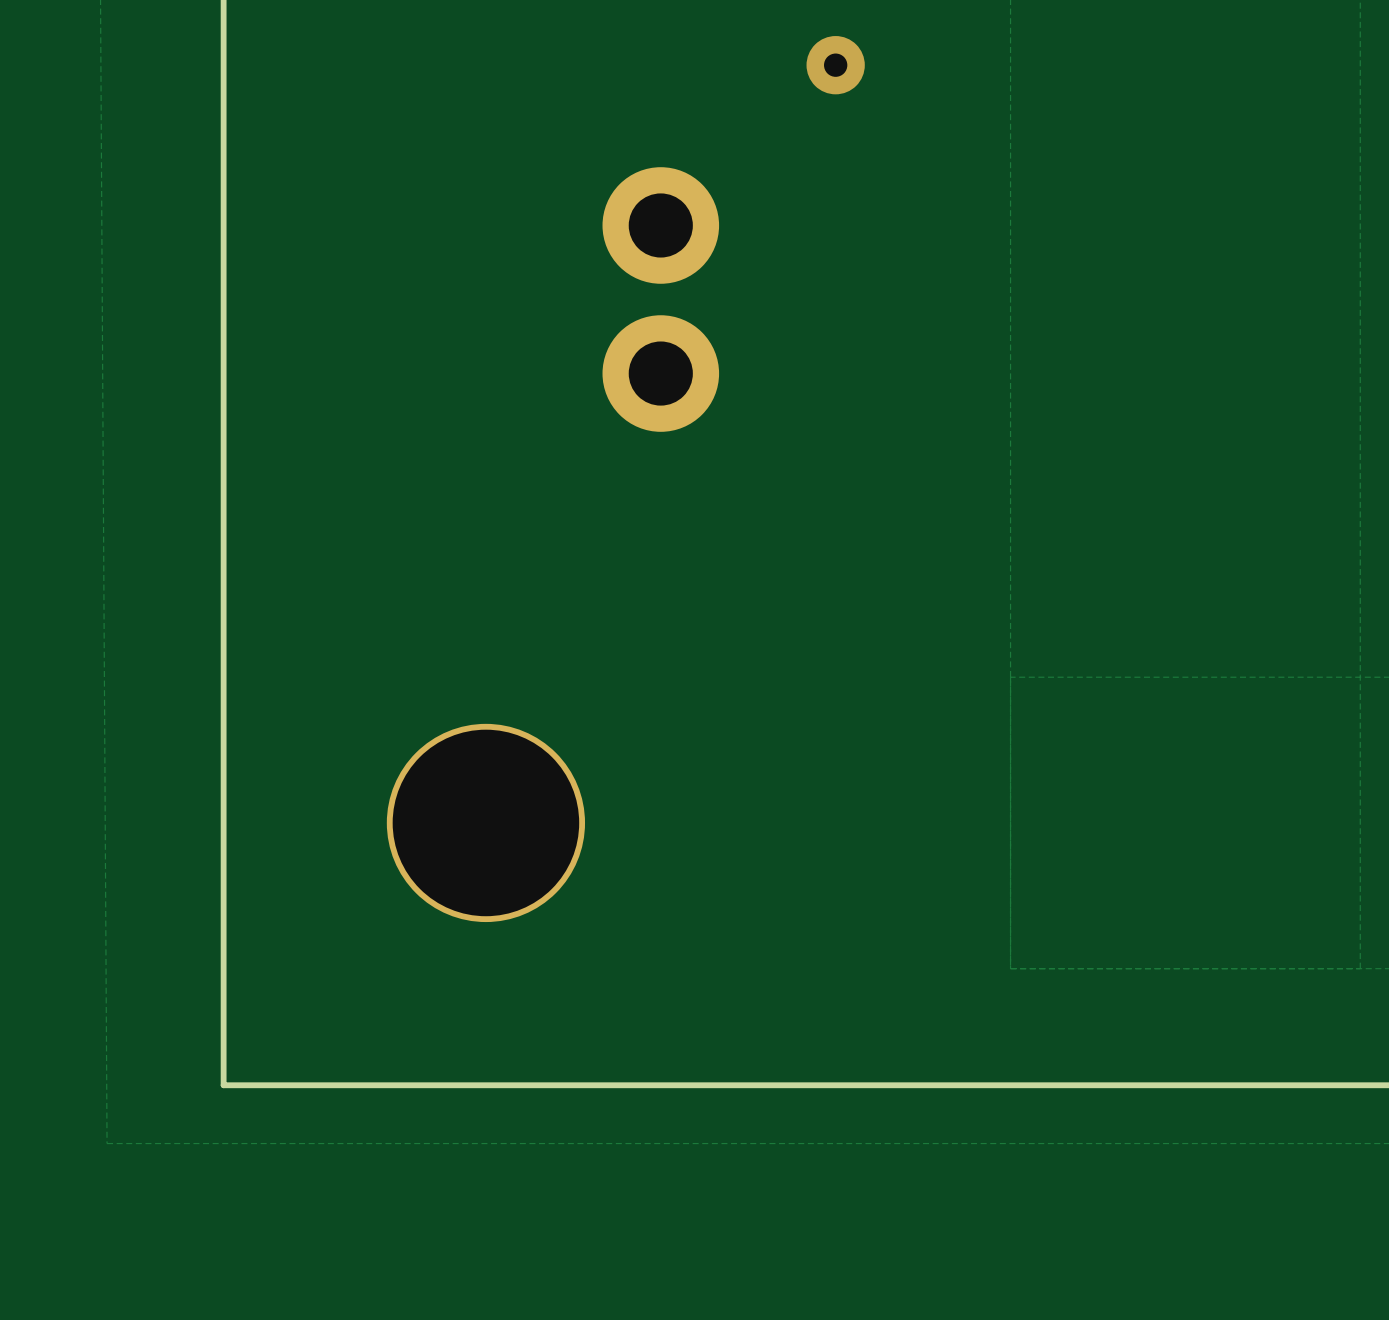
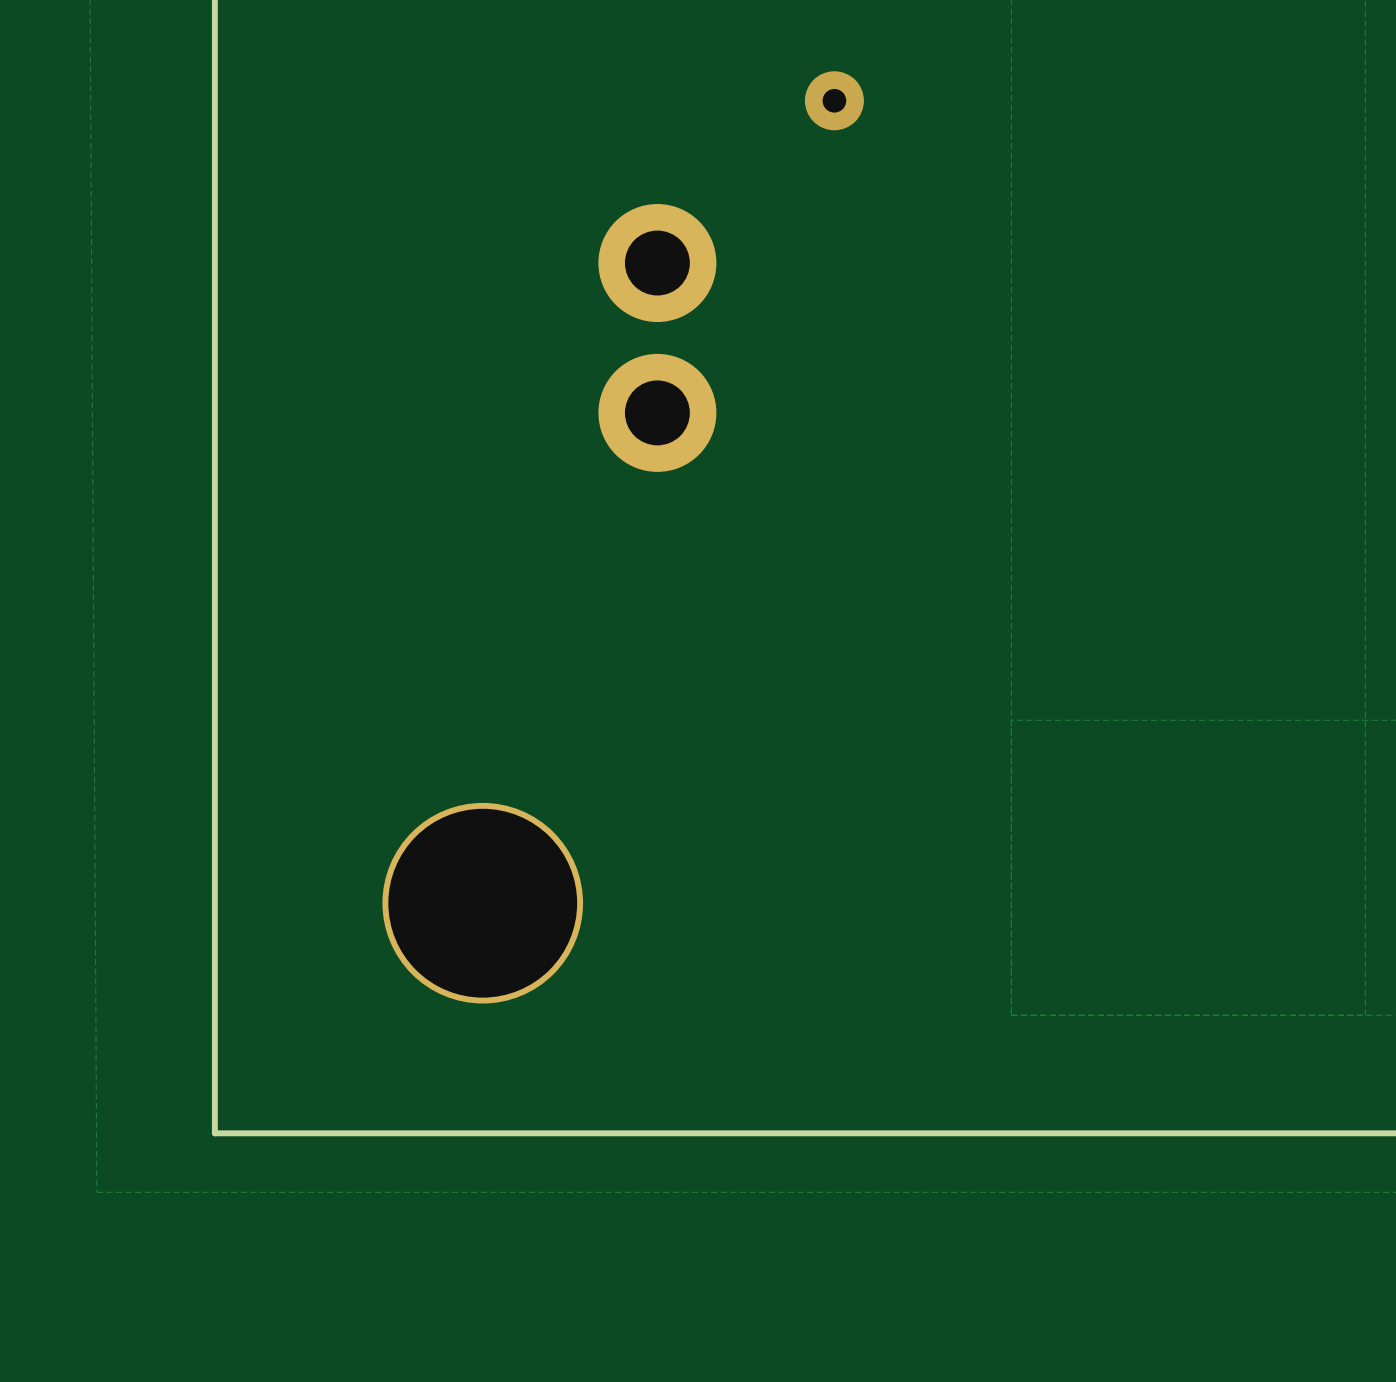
part position: (485, 822) -> (482, 903)

